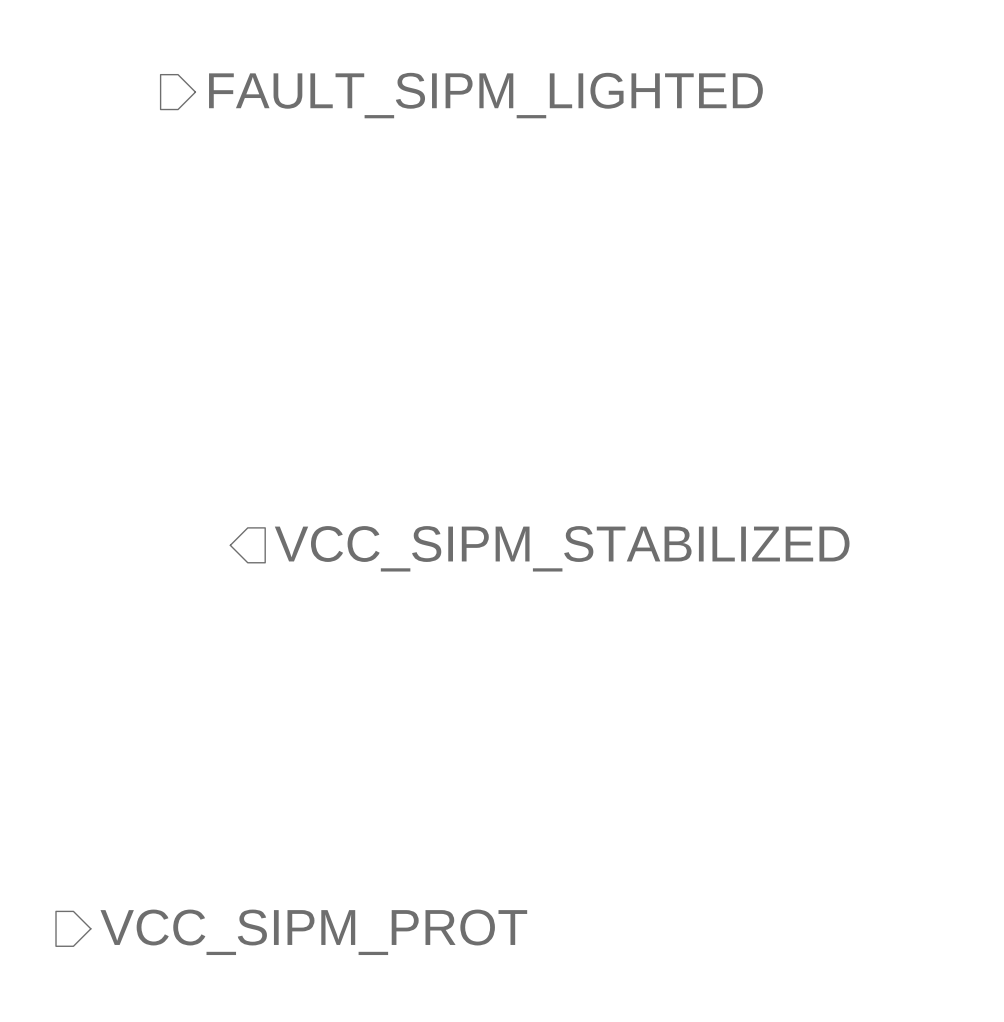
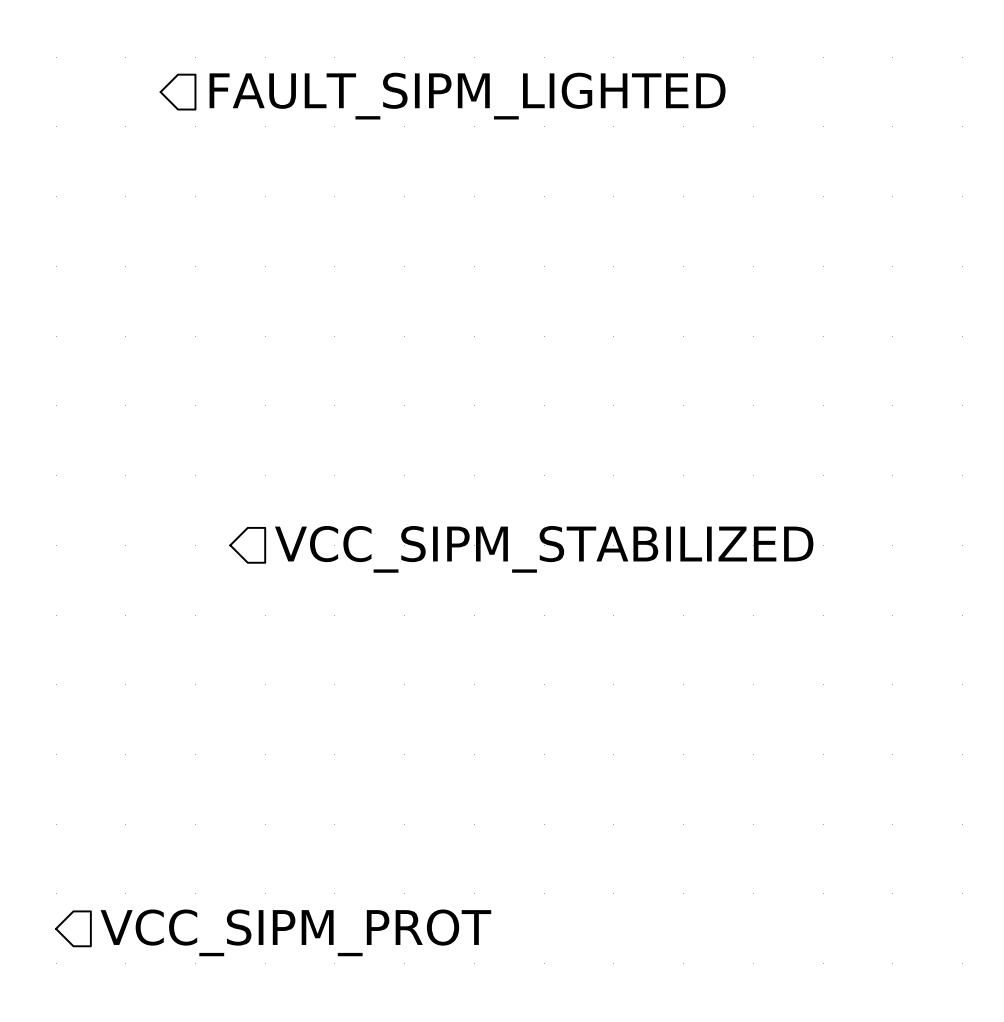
hierarchical label shape: output (485, 95) -> input (467, 96)
hierarchical label shape: output (313, 932) -> input (295, 932)

